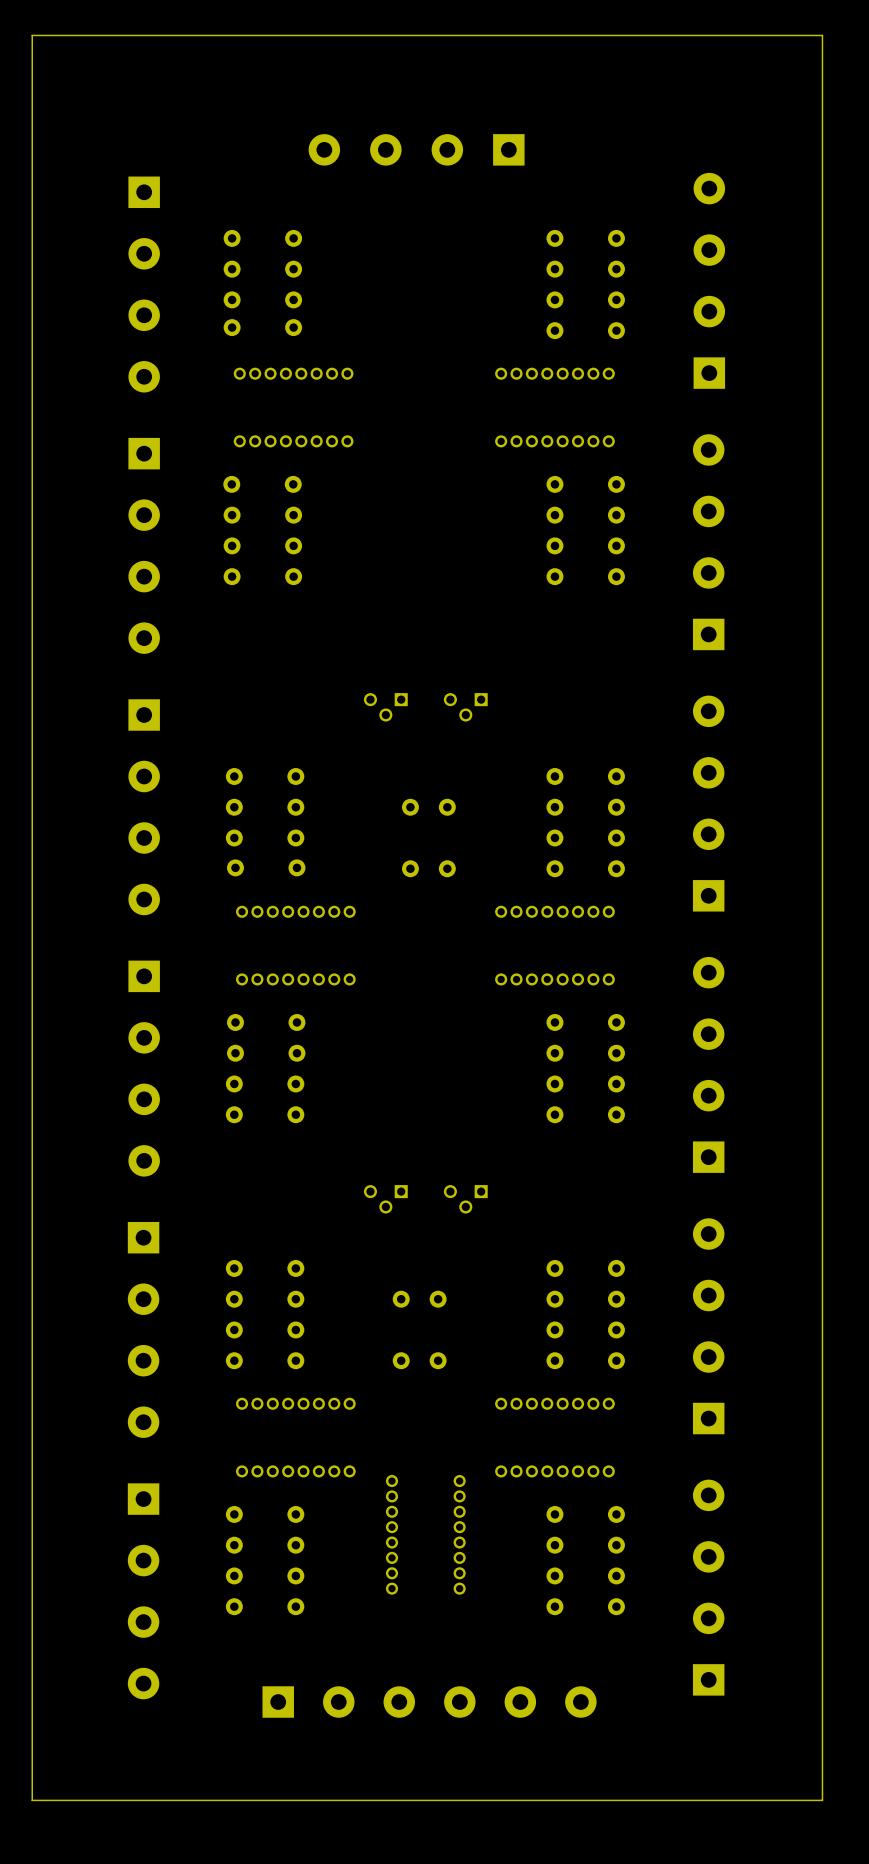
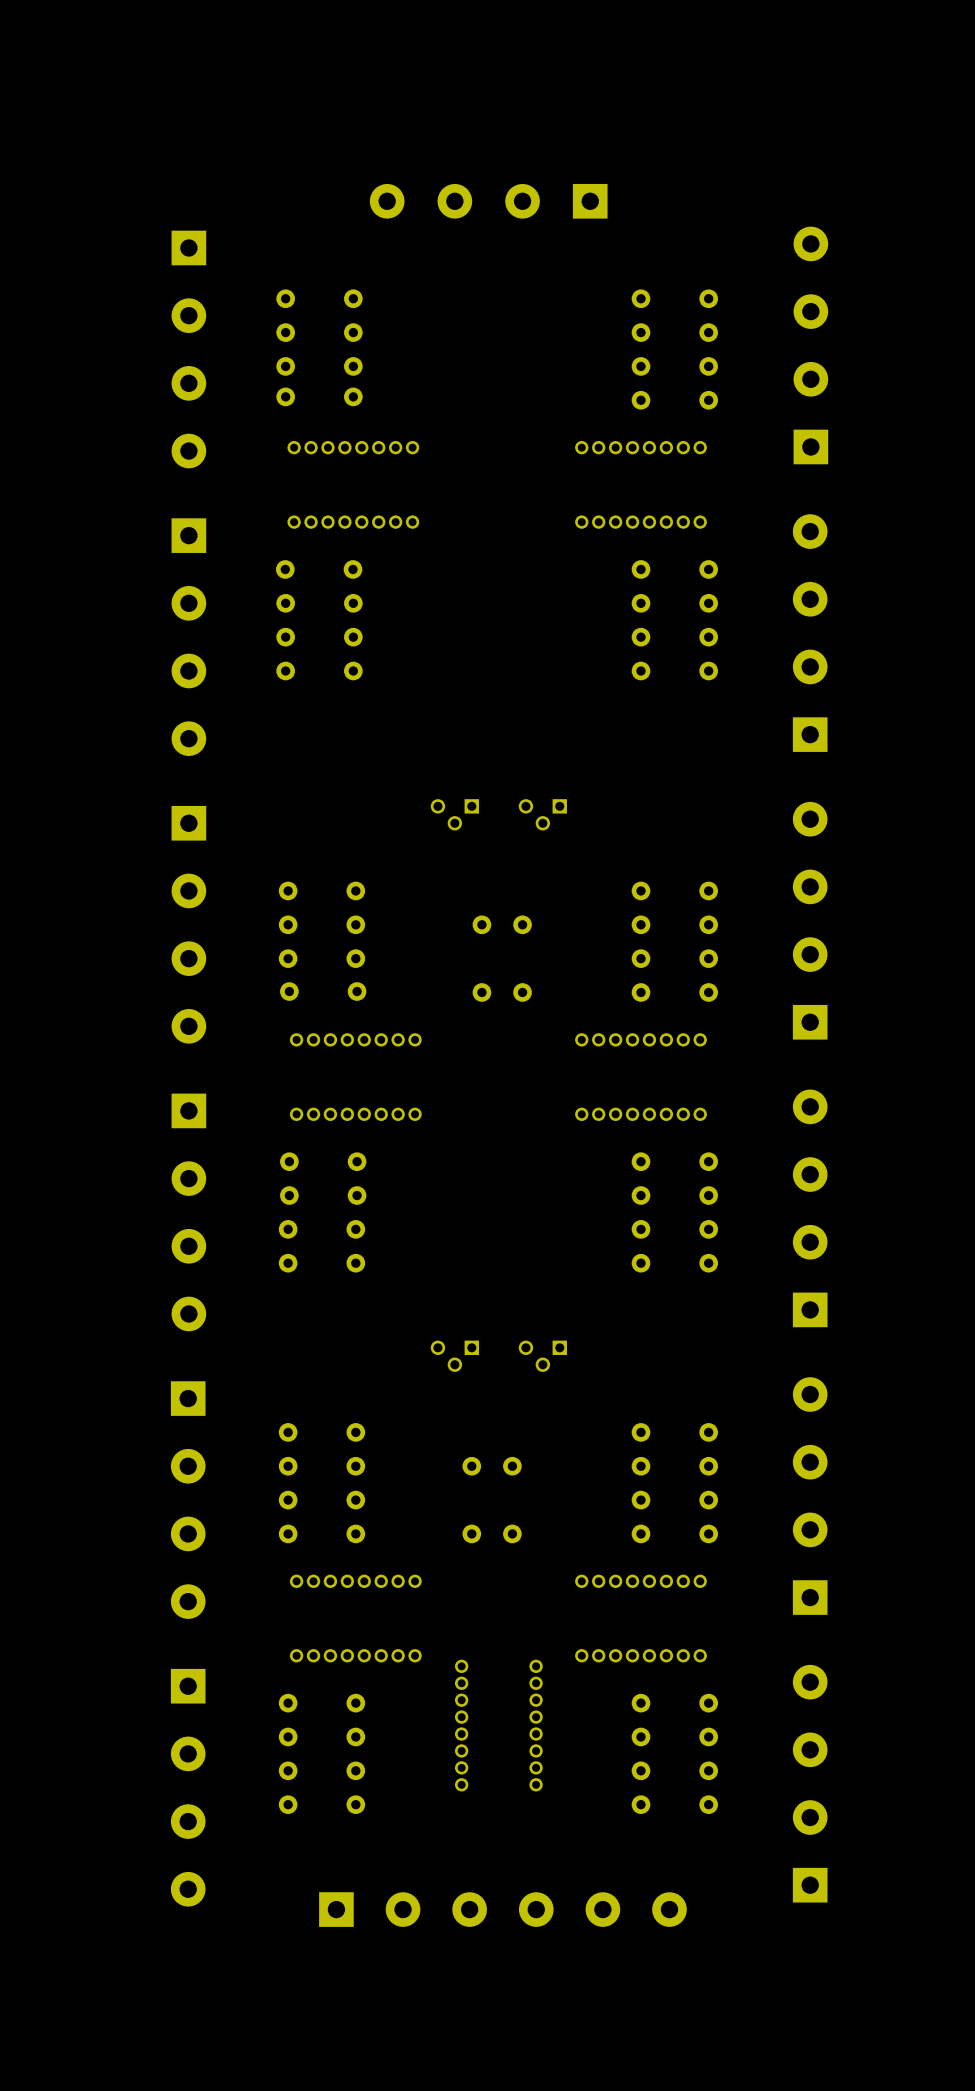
board edge: (822, 35) (822, 1800) (32, 1800) (32, 35) (822, 35) -> none

